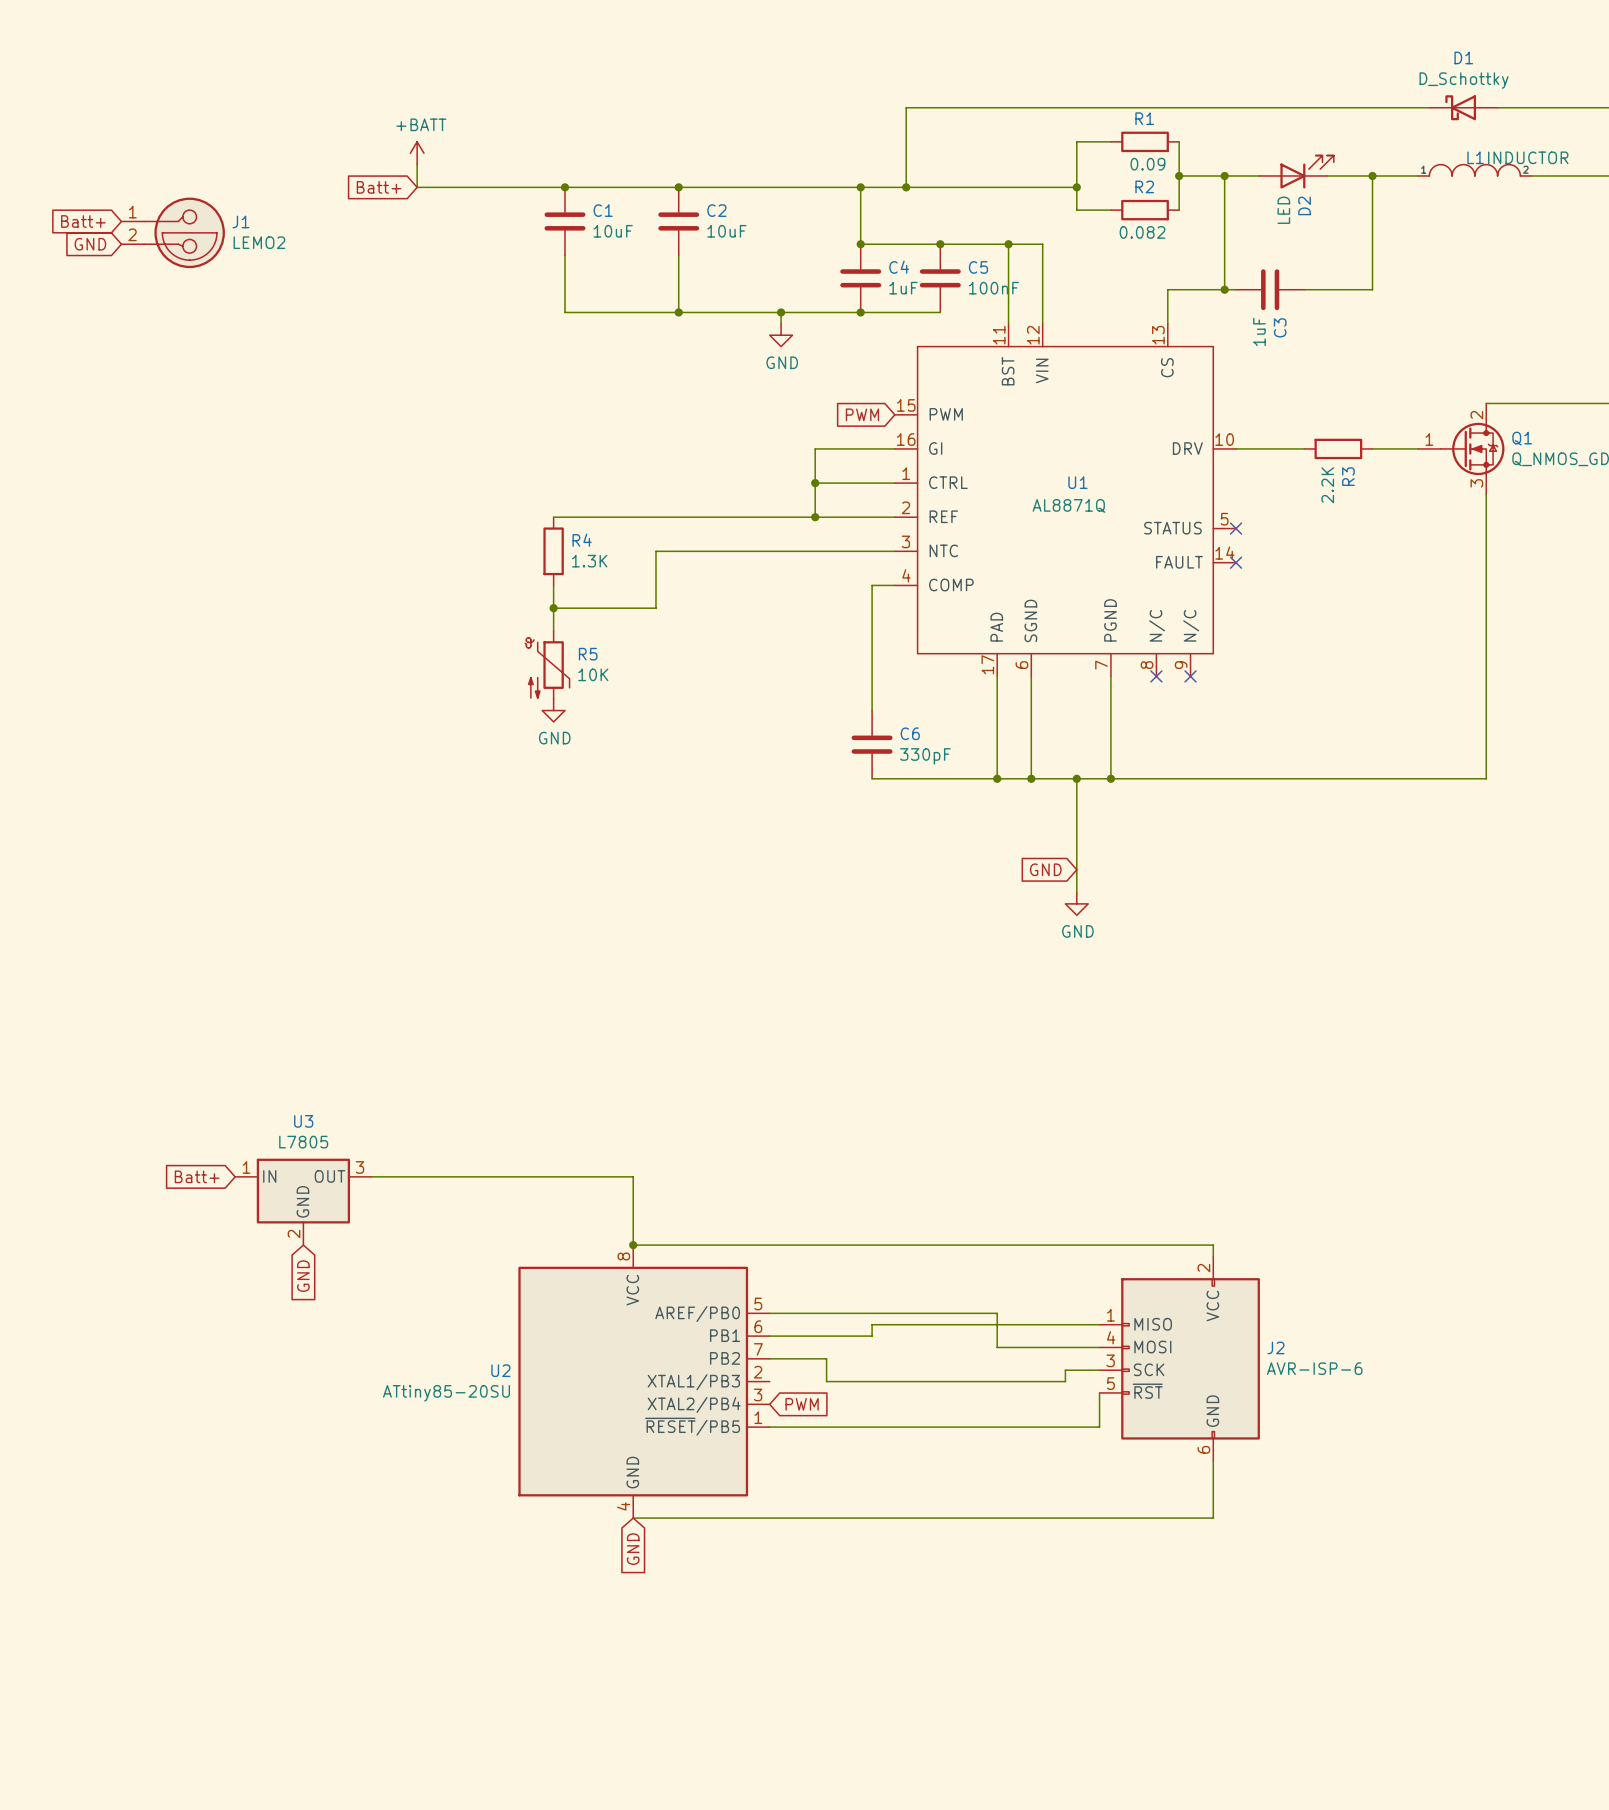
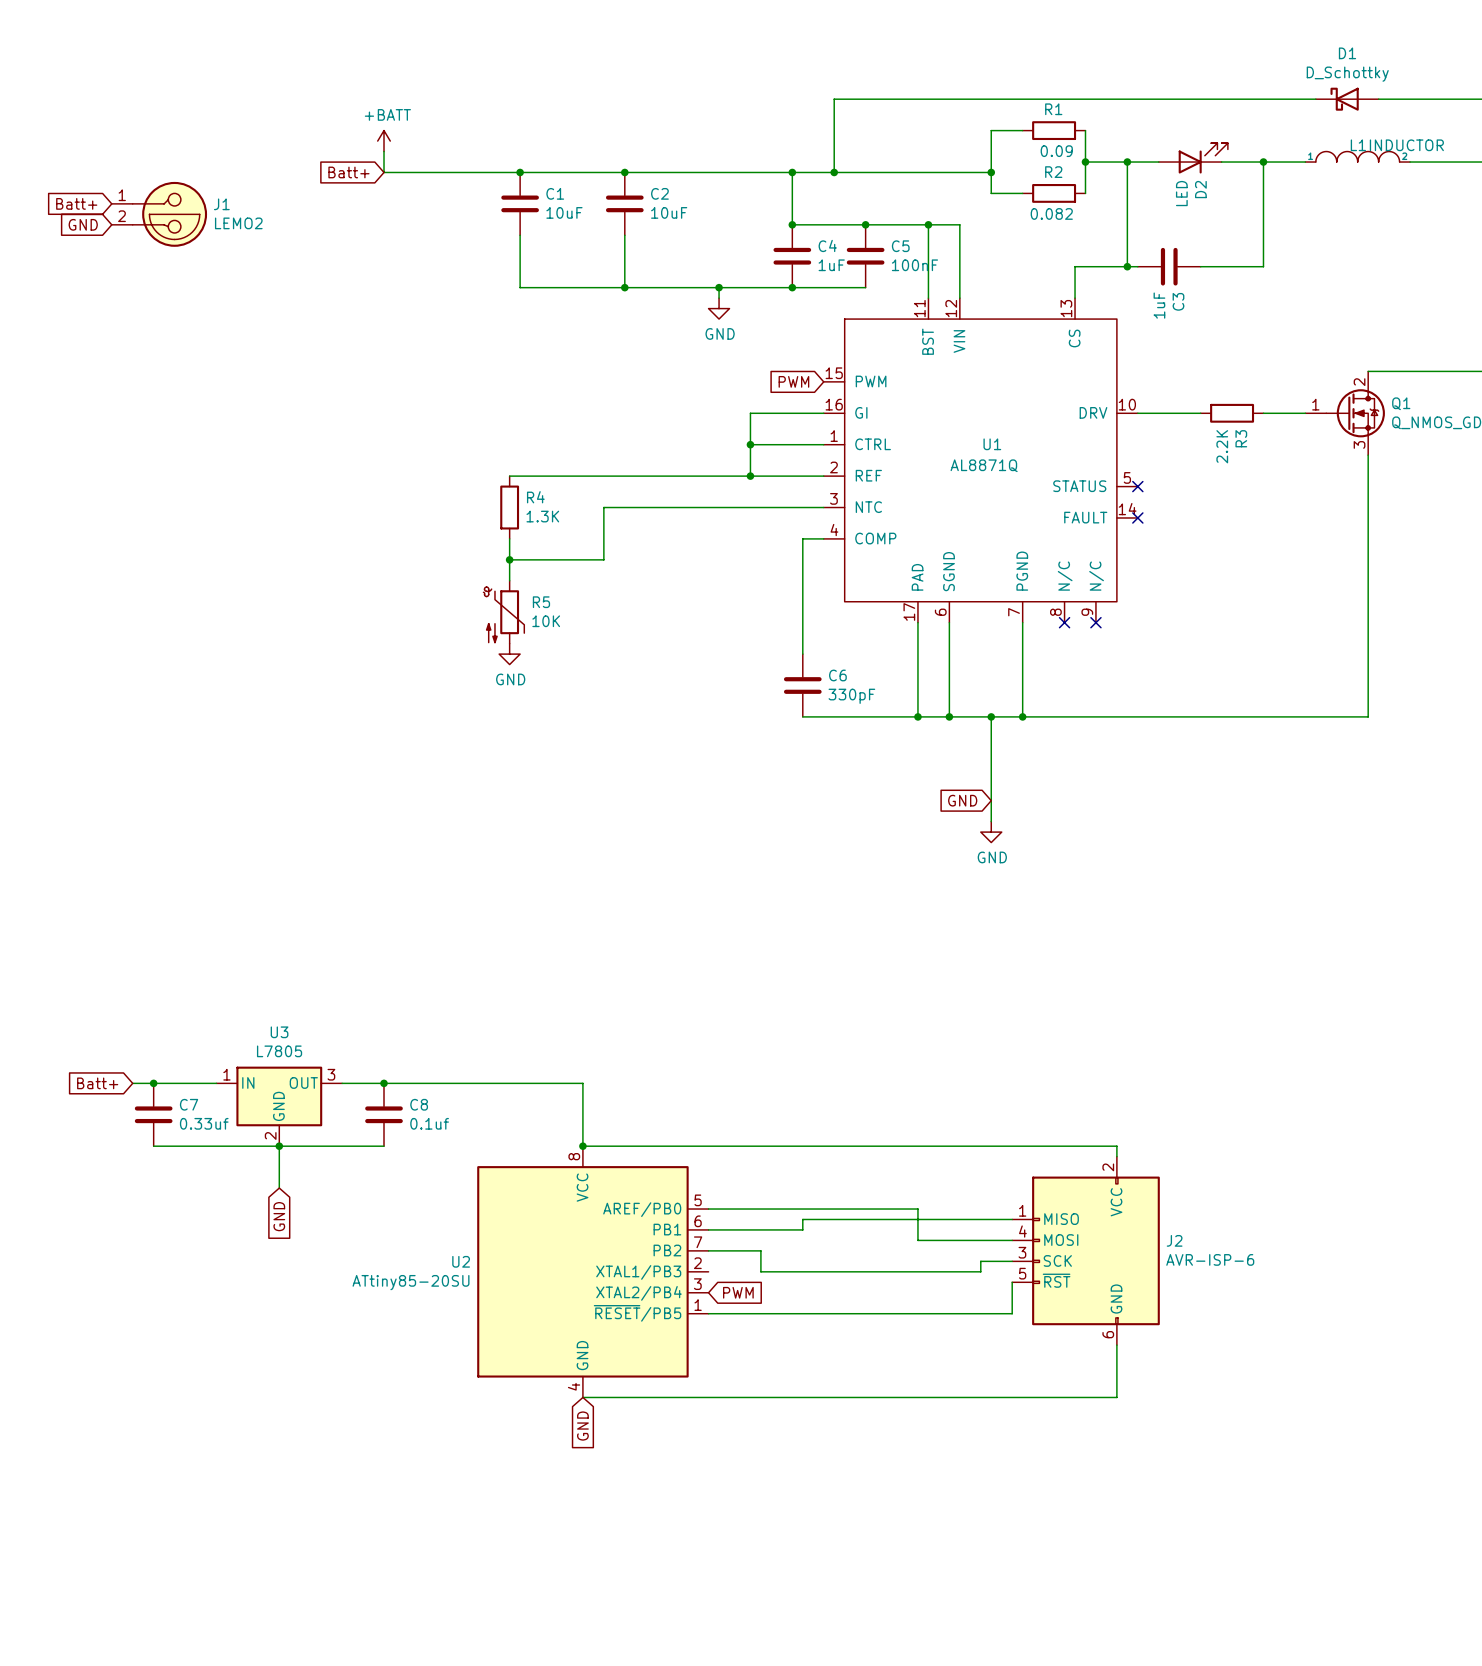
wire: none -> (132, 1083) (216, 1083)
junction: none -> (153, 1083)
global label position: Batt+ (197, 1176) -> Batt+ (97, 1083)
junction: none -> (384, 1083)
C7: none -> 0.33uf (153, 1114)
C8: none -> 0.1uf (384, 1114)
wire: none -> (153, 1146) (384, 1146)
wire: none -> (279, 1146) (279, 1188)
junction: none -> (279, 1146)
global label position: GND (303, 1276) -> GND (279, 1216)

